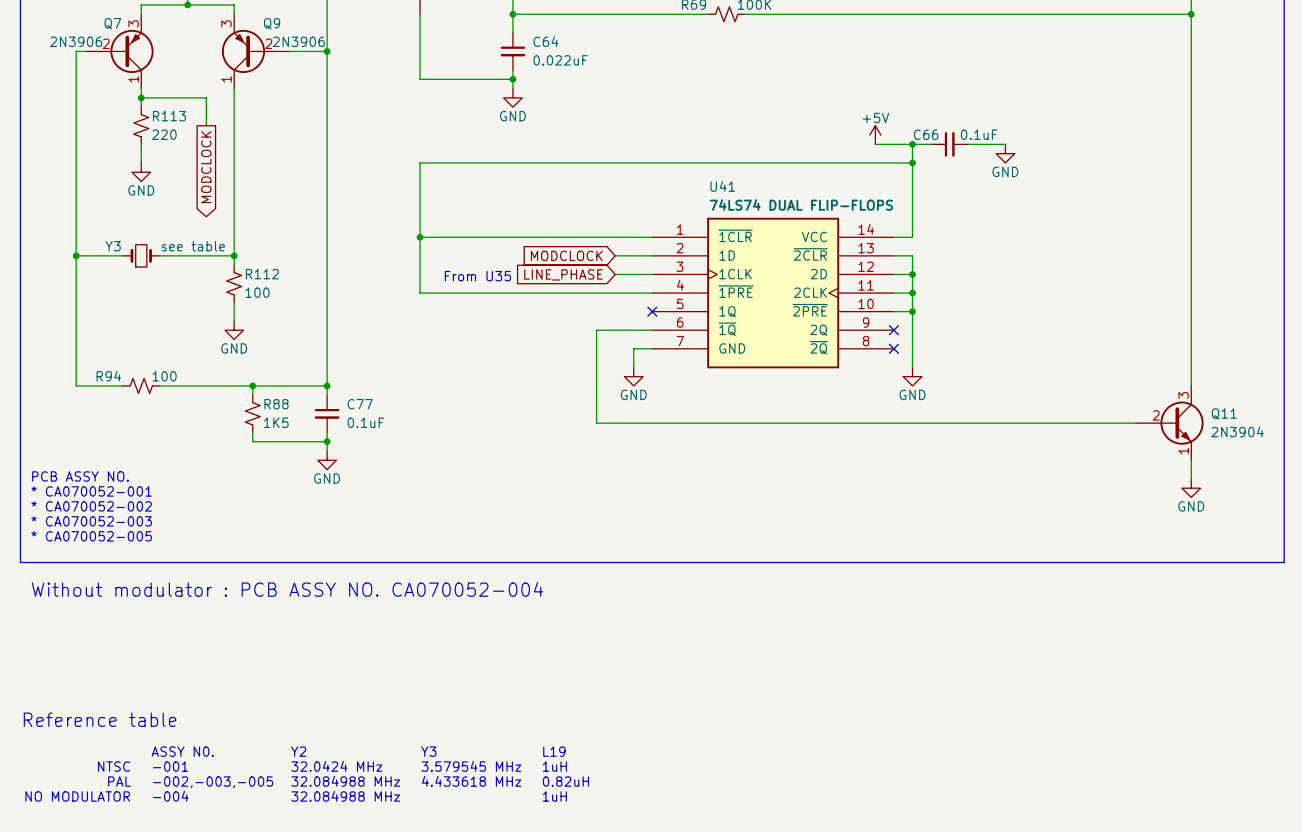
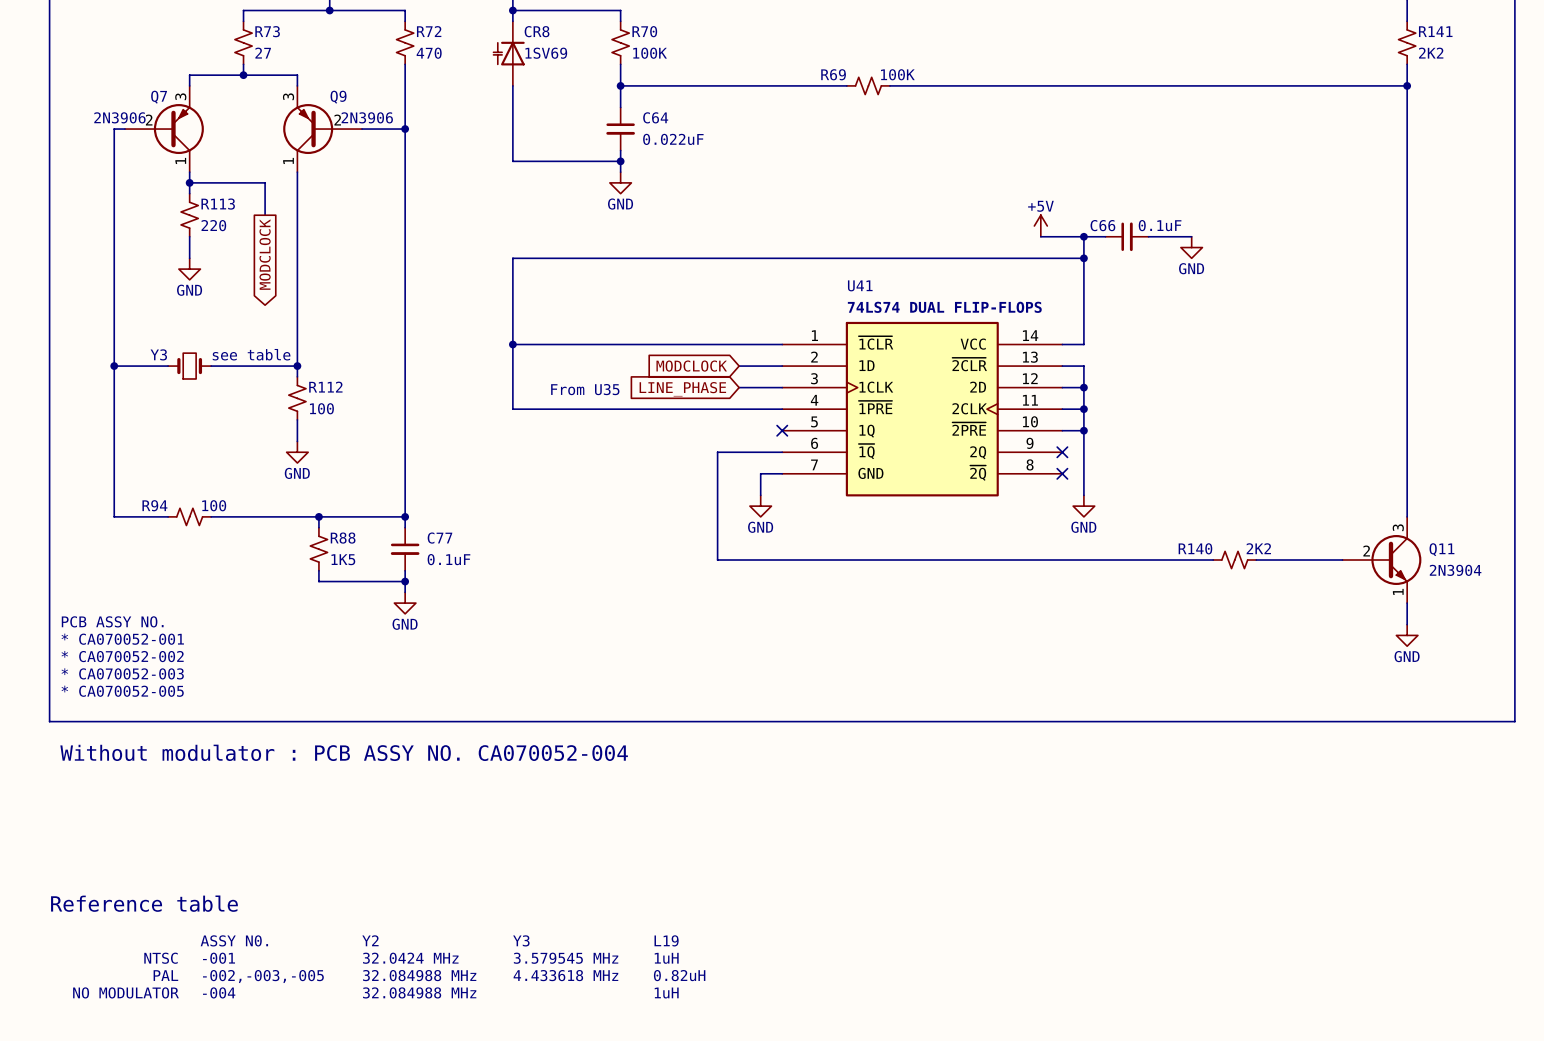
R140: none -> 2K2 (1234, 560)

